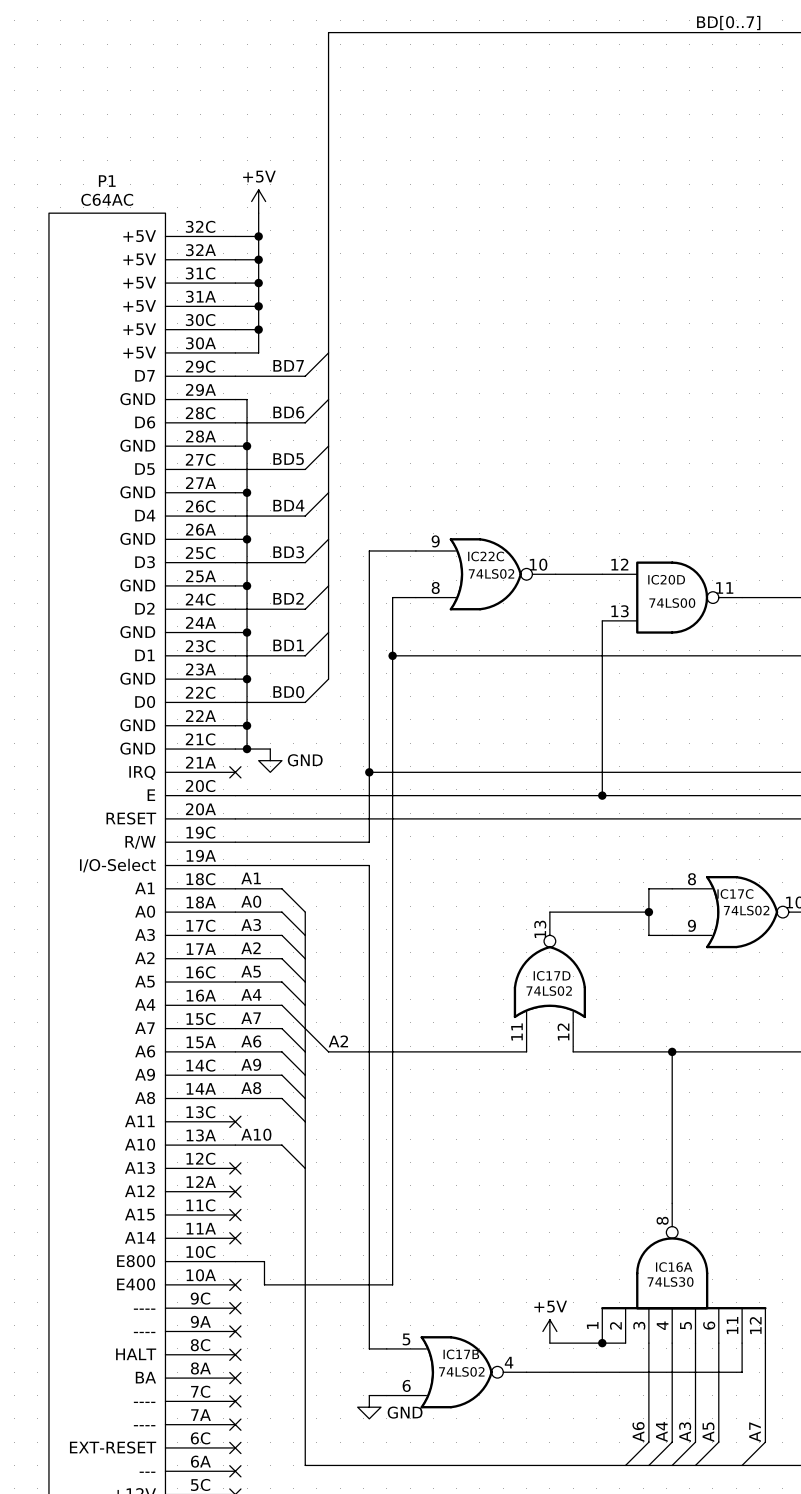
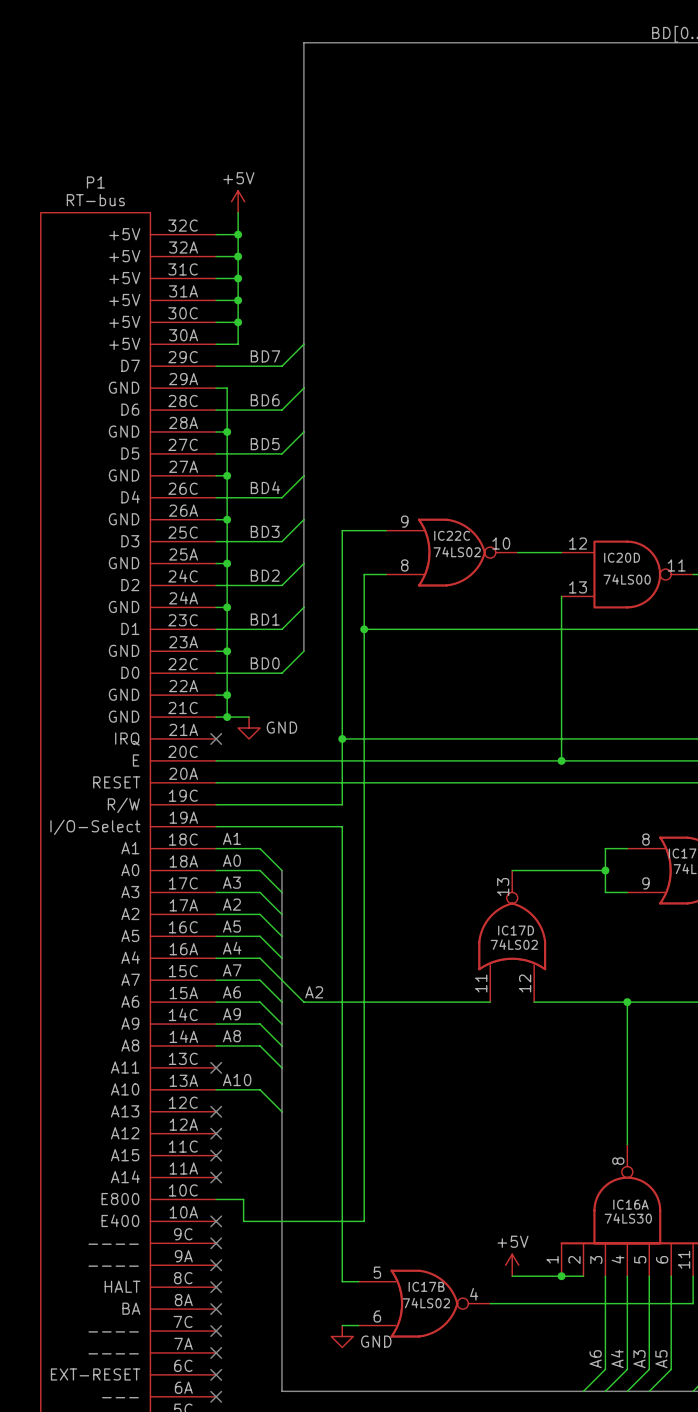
P1 value: C64AC (107, 199) -> RT-bus (95, 200)

